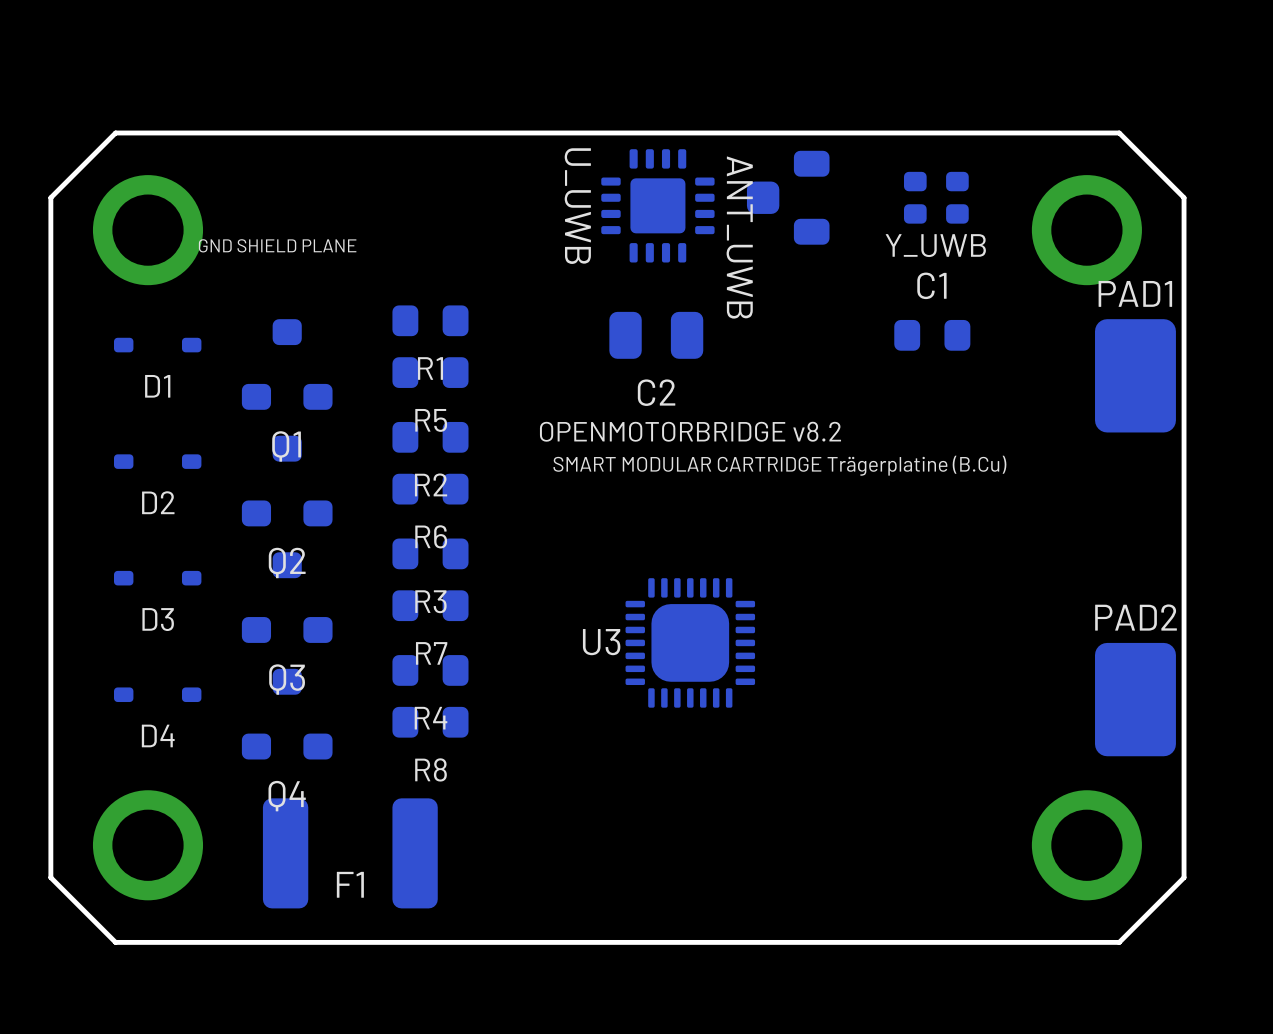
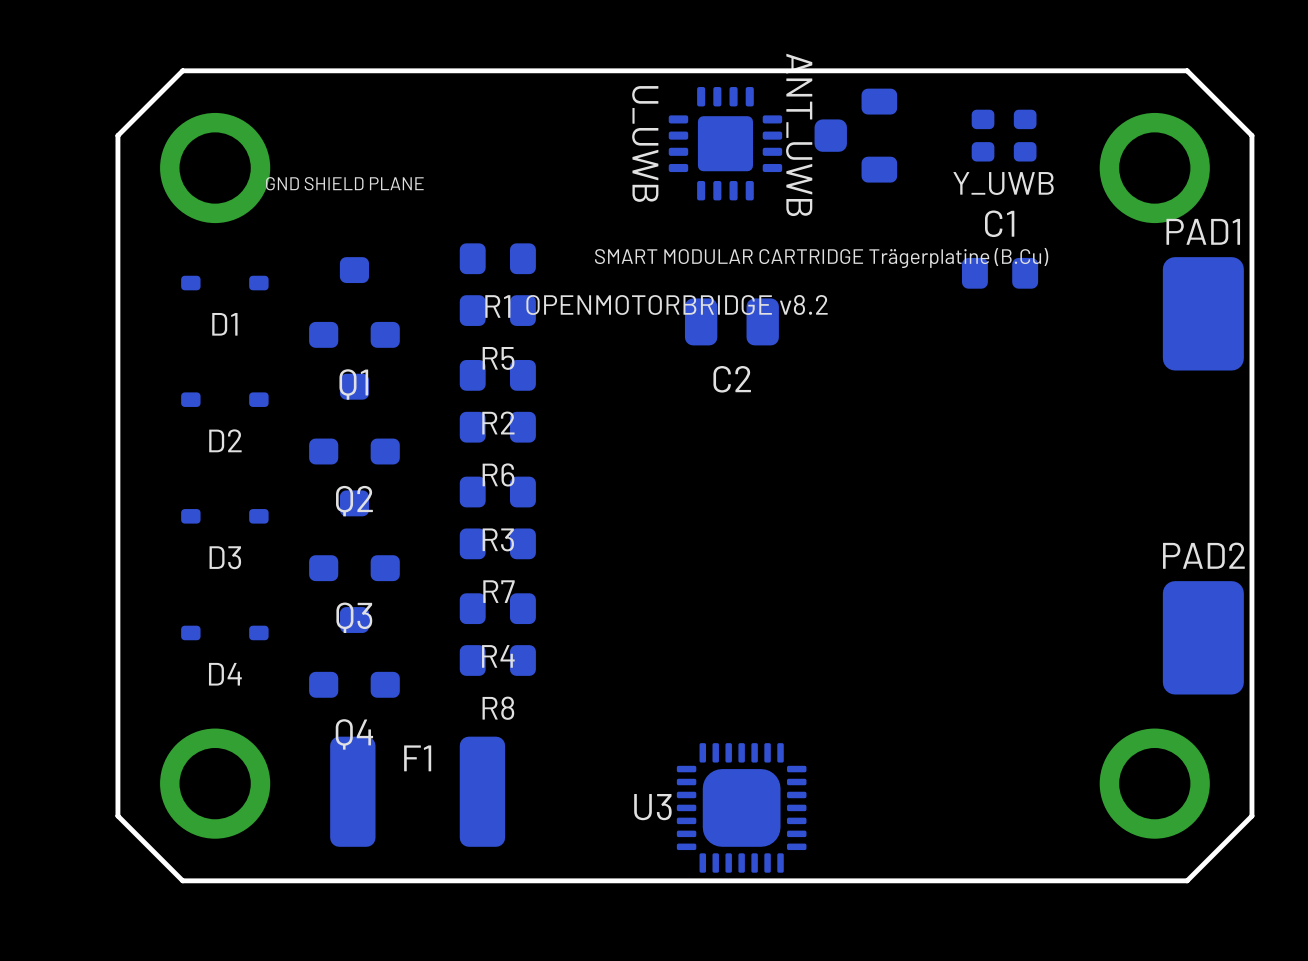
ANT_UWB name position: ANT_UWB (739, 237) -> ANT_UWB (799, 134)
C2 position: (656, 335) -> (731, 321)
text position: OPENMOTORBRIDGE v8.2 (690, 431) -> OPENMOTORBRIDGE v8.2 (677, 304)
text position: SMART MODULAR CARTRIDGE Trägerplatine (B.Cu) (779, 465) -> SMART MODULAR CARTRIDGE Trägerplatine (B.Cu) (821, 257)
U3 position: (690, 642) -> (741, 807)
F1 name position: F1 (350, 884) -> F1 (417, 758)

